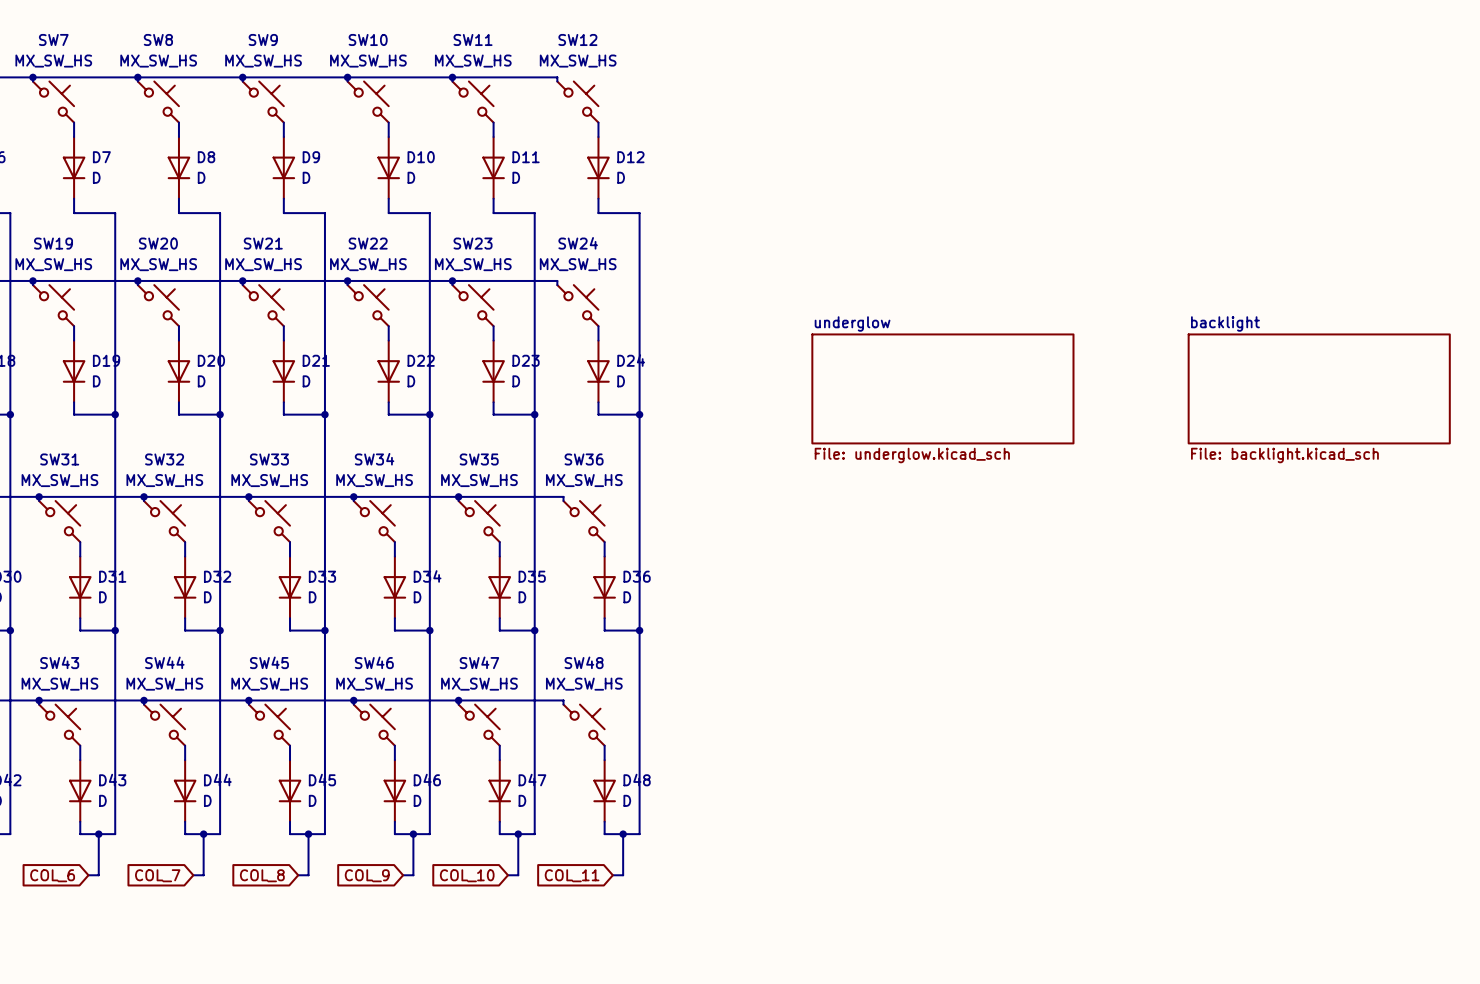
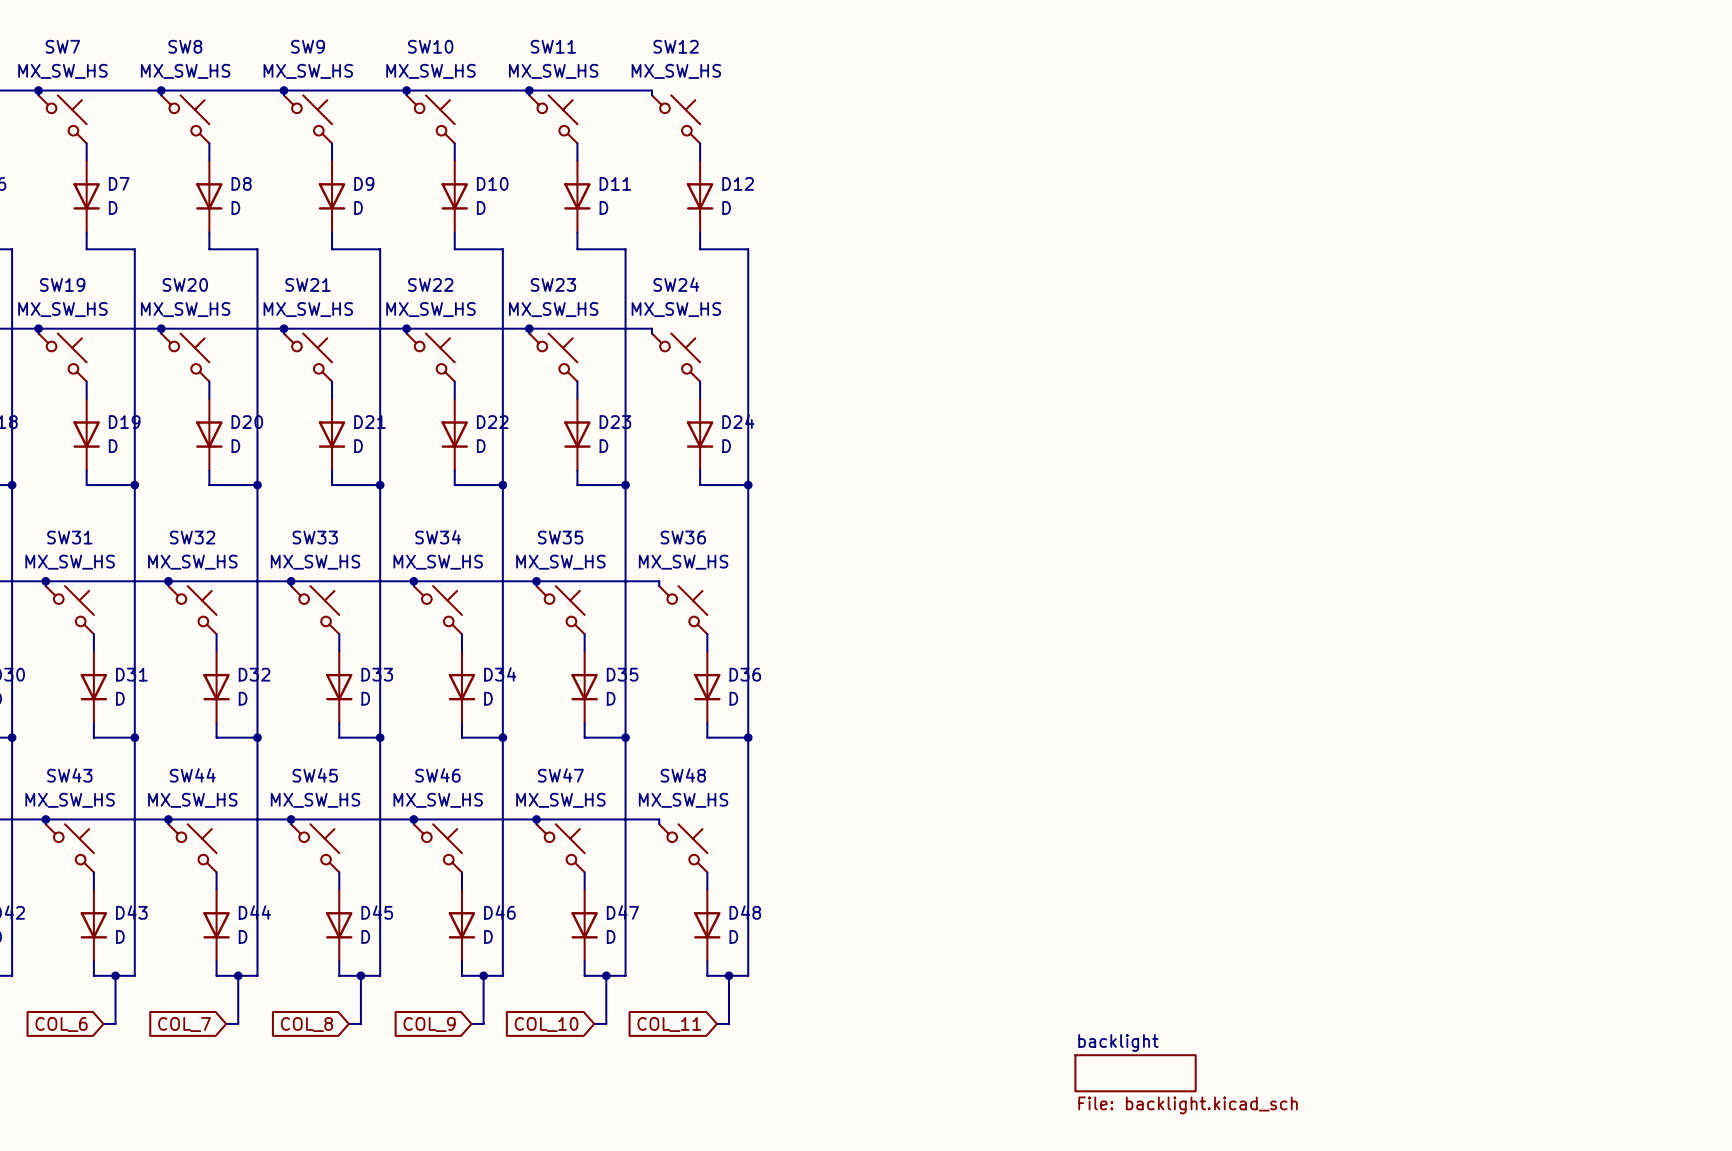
sheet underglow: File: underglow.kicad_sch (942, 388) -> none
sheet backlight: File: backlight.kicad_sch (1319, 388) -> none
sheet backlight: none -> File: backlight.kicad_sch (1135, 1073)

